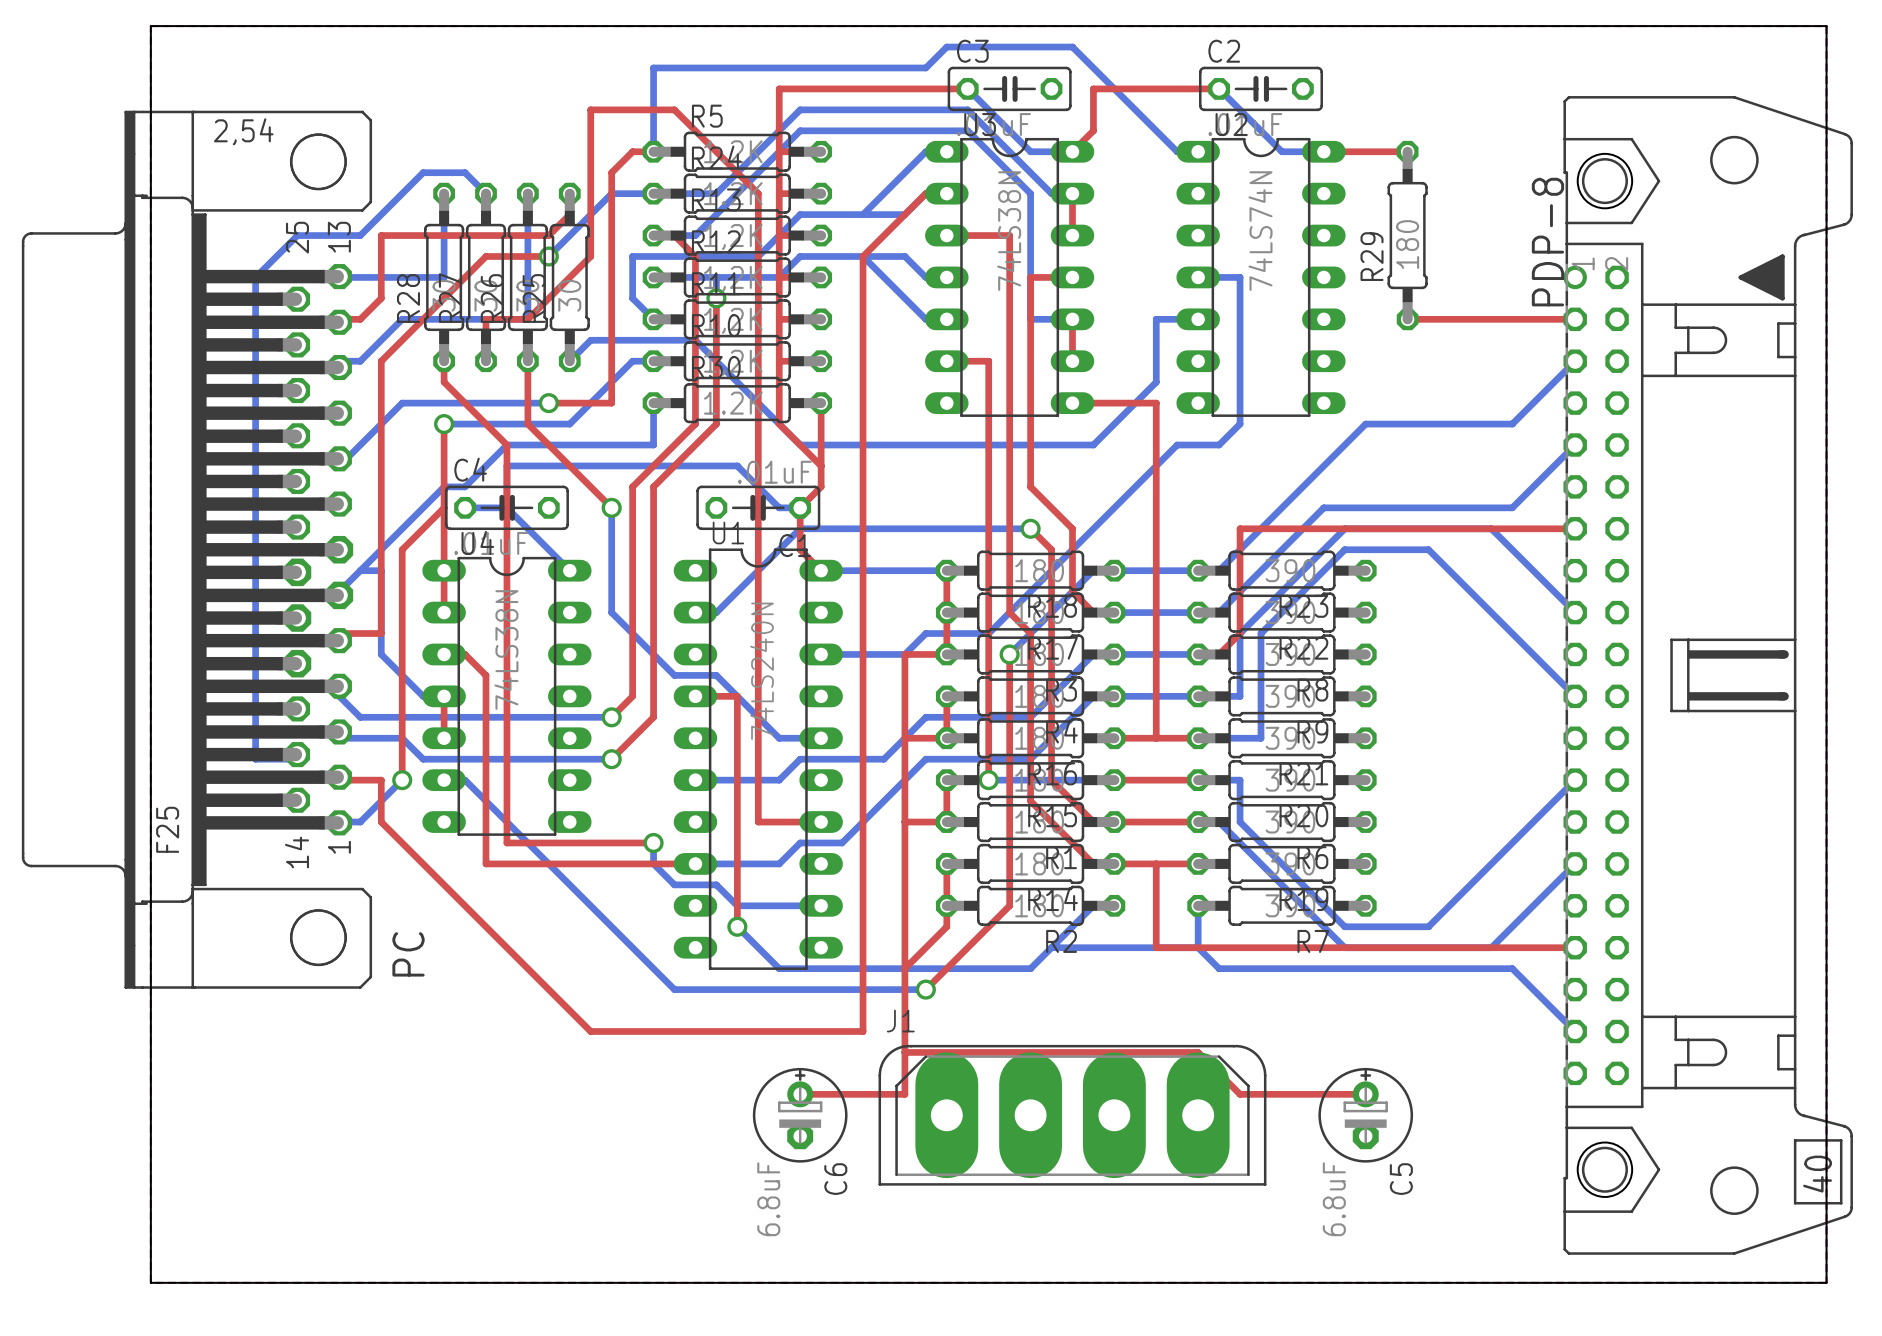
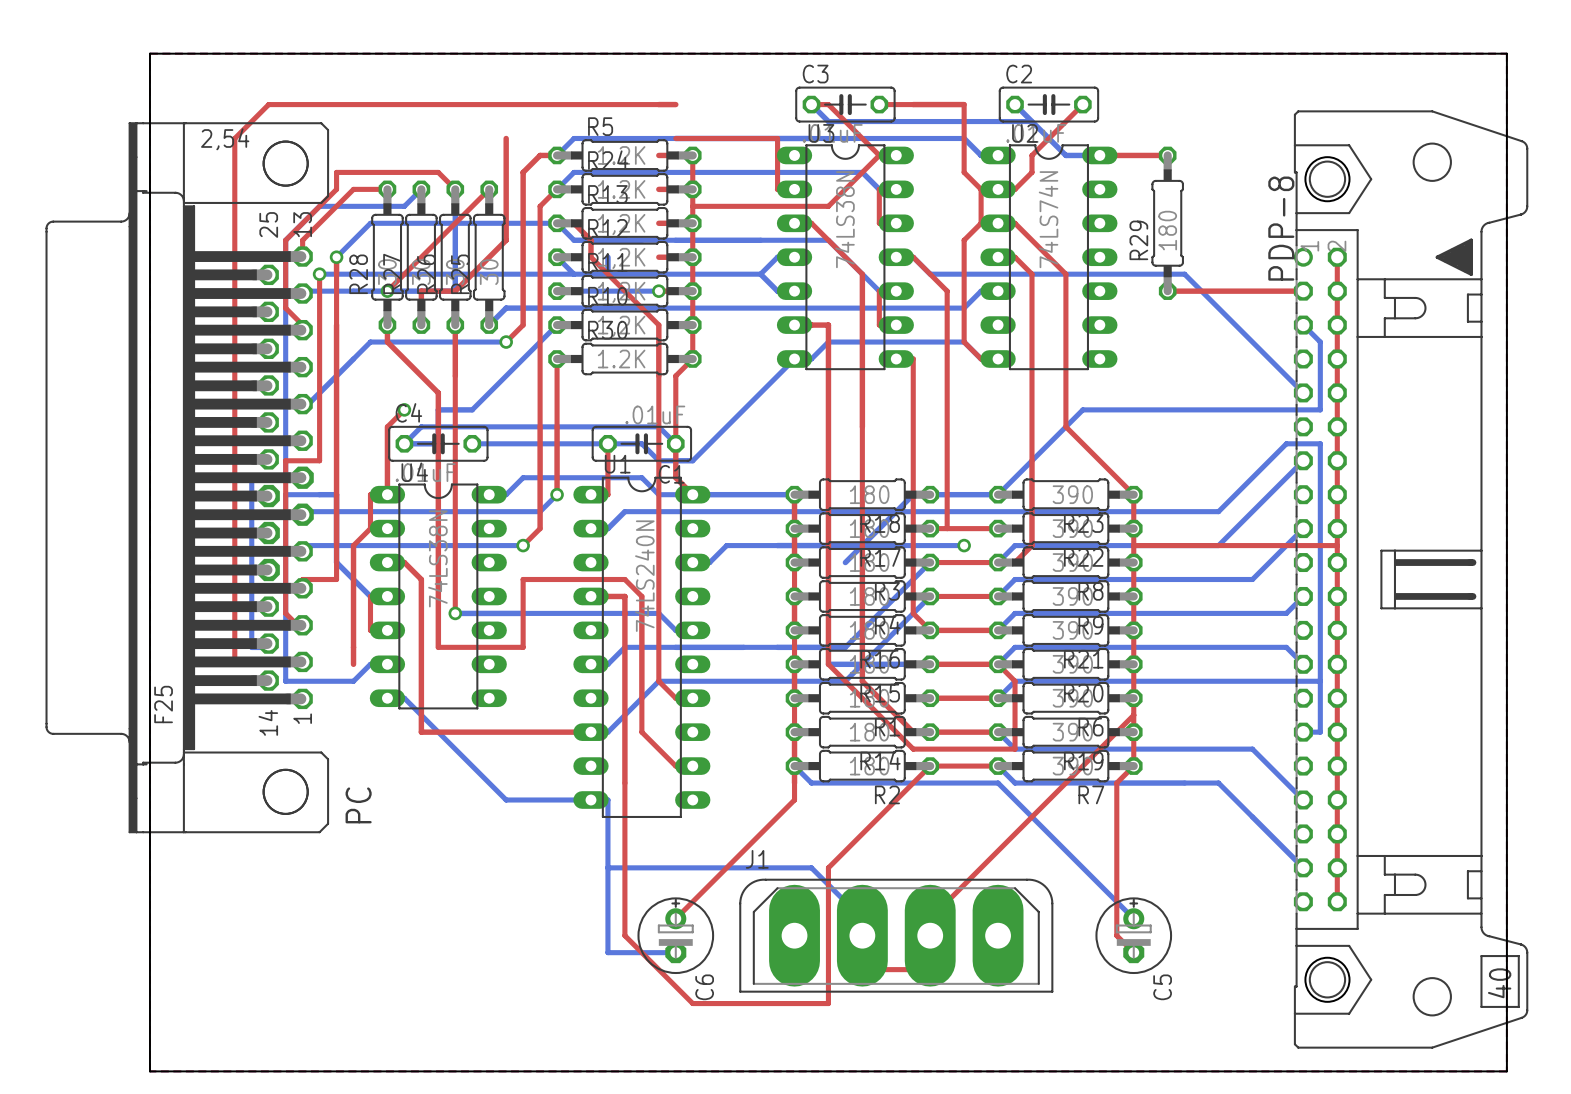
top track: (779, 88) (779, 361) (821, 361) -> none
top track: (800, 88) (967, 88) -> (879, 155) (828, 104) (811, 104)
top track: (1093, 88) (1093, 130) (1072, 151) -> (913, 104) (879, 104)
top track: (1156, 88) (1219, 88) -> (964, 104) (964, 172) (981, 189)
top track: none -> (1082, 104) (1031, 155) (1031, 172) (1015, 189) (981, 189)
bottom track: (988, 109) (1030, 151) (1072, 151) -> (828, 121) (1031, 121)
top track: (590, 130) (590, 109) (674, 109) (758, 193) (758, 696) -> none
top track: none -> (675, 138) (777, 138) (777, 189)
bottom track: (800, 130) (695, 235) (653, 235) -> (675, 138) (574, 138) (557, 155)
bottom track: (967, 130) (1030, 193) (1030, 319) (1051, 319) -> (811, 138) (964, 138)
bottom track: (1156, 130) (1072, 47) (946, 47) (925, 67) (653, 67) (653, 151) -> none
bottom track: (946, 151) (925, 151) (863, 214) -> none
top track: none -> (879, 155) (828, 206) (692, 206)
bottom track: (1030, 172) (967, 109) (800, 109) (716, 193) (611, 193) (548, 256) -> (862, 172) (574, 172) (557, 189)
top track: none -> (387, 189) (353, 189) (302, 240) (302, 257)
bottom track: (444, 193) (444, 277) (339, 276) -> none
bottom track: (486, 193) (465, 172) (423, 172) (360, 235) (297, 235) (255, 277) (255, 759) (276, 759) -> (421, 189) (404, 206) (319, 206) (285, 240) (285, 477) (251, 477) (251, 647)
top track: none -> (455, 189) (438, 172) (336, 172) (336, 189) (285, 240) (285, 308) (302, 325) (302, 330)
top track: (569, 193) (569, 214) (548, 235) (381, 235) (381, 277) -> (489, 189) (387, 291)
top track: (925, 193) (863, 256) (863, 1031) (590, 1031) (381, 822) (381, 780) (339, 780) -> (658, 104) (268, 104) (234, 138) (234, 664) (302, 664)
bottom track: (946, 193) (925, 193) (904, 214) (800, 214) (758, 256) -> none
top track: (1072, 193) (1072, 235) -> (896, 189) (879, 189) (879, 223) (896, 223)
top track: none -> (981, 189) (981, 223)
top track: (967, 235) (1009, 235) (1009, 612) (1030, 633) -> none
top track: none -> (981, 223) (964, 240) (964, 342) (981, 359) (998, 359)
top track: none -> (981, 223) (1015, 223) (1065, 274) (1065, 426) (1133, 494) (1133, 766) (1116, 783) (1116, 935) (1133, 952)
top track: (548, 256) (486, 256) (381, 361) -> none
via: (548, 256) -> none
bottom track: (674, 256) (632, 256) (632, 298) (653, 319) -> (658, 291) (557, 291)
bottom track: none -> (574, 240) (557, 223) (370, 223) (336, 257)
bottom track: (800, 256) (779, 277) (653, 277) -> (675, 240) (641, 240)
bottom track: (863, 256) (904, 298) -> none
bottom track: (904, 256) (925, 277) -> (760, 240) (828, 240) (879, 291)
via: none -> (336, 257)
bottom track: none -> (557, 257) (574, 274)
top track: (695, 277) (695, 424) (632, 486) -> (557, 189) (540, 206) (540, 426)
top track: none -> (590, 257) (658, 325)
bottom track: none -> (777, 257) (760, 274) (319, 274)
top track: (1072, 277) (1030, 277) (1030, 298) -> (811, 223) (862, 274)
top track: none -> (896, 257) (913, 257) (947, 291) (947, 528)
bottom track: (1198, 277) (1240, 277) (1240, 424) (1219, 445) (1177, 445) (988, 633) -> (964, 545) (828, 545)
top track: none -> (1337, 257) (1337, 901)
top track: none -> (319, 274) (319, 460) (285, 460) (285, 613) (302, 630) (302, 625)
via: none -> (319, 274)
top track: (381, 298) (360, 319) (339, 319) (339, 322) -> (336, 274) (336, 325)
top track: (716, 298) (716, 424) (653, 486) -> (557, 359) (557, 426)
via: (716, 298) -> none
bottom track: (402, 319) (360, 361) (339, 361) (339, 367) -> (353, 291) (302, 291) (302, 293)
via: none -> (387, 291)
via: none -> (658, 291)
top track: (1072, 319) (1072, 361) -> (896, 291) (879, 291) (879, 325) (896, 325)
bottom track: (1177, 319) (1156, 319) (1156, 382) (1093, 445) (800, 445) (695, 340) -> (981, 291) (964, 308) (590, 308)
top track: (611, 361) (611, 403) (548, 403) -> (523, 325) (506, 342)
bottom track: (653, 361) (632, 361) (569, 424) (444, 424) -> (557, 325) (472, 409)
bottom track: (1575, 361) (1512, 424) (1365, 424) (1219, 570) (1198, 570) -> (1303, 325) (1320, 342) (1320, 409) (1082, 409) (998, 494)
via: none -> (506, 342)
bottom track: (402, 403) (548, 403) -> (353, 359) (370, 342) (506, 342)
via: (548, 403) -> none
bottom track: (653, 403) (653, 445) (506, 445) (465, 486) (444, 486) (339, 591) -> (557, 494) (540, 511) (302, 511)
top track: (821, 403) (821, 486) (800, 507) -> (692, 155) (692, 359) (675, 375) (675, 443)
top track: (1093, 403) (1156, 403) (1156, 738) -> (913, 359) (913, 613) (930, 630)
top track: (444, 424) (444, 486) -> (404, 409) (387, 426)
via: (444, 424) -> none
top track: (527, 424) (611, 507) -> (455, 375) (455, 613)
top track: (779, 424) (821, 465) -> (658, 375) (658, 681) (675, 698)
bottom track: (1575, 445) (1512, 507) (1323, 507) (1219, 612) (1114, 612) -> (1303, 392) (1184, 274) (930, 274) (913, 257) (896, 257)
via: none -> (404, 409)
bottom track: (548, 465) (737, 465) (779, 507) (800, 507) -> (404, 443) (421, 426) (658, 426) (675, 443)
top track: (1030, 486) (1072, 528) (1072, 591) (1093, 612) (1114, 612) -> (862, 426) (862, 545)
top track: (444, 507) (402, 549) (402, 633) -> (370, 528) (353, 545)
bottom track: (506, 507) (569, 570) -> (692, 494) (658, 494) (641, 477) (523, 477) (506, 494) (489, 494)
bottom track: (611, 507) (611, 612) (674, 675) (716, 675) (779, 738) (800, 738) -> (523, 613) (658, 613) (675, 630)
via: (611, 507) -> none
top track: none -> (607, 443) (607, 494) (590, 494)
bottom track: (800, 528) (737, 591) -> (675, 460) (658, 460) (641, 443) (472, 443)
bottom track: (821, 528) (1030, 528) -> (692, 460) (794, 359) (811, 359) (828, 342) (964, 342) (981, 359) (998, 359)
top track: (1030, 528) (1051, 549) (1051, 780) (1093, 822) (1114, 822) -> none
via: (1030, 528) -> none
top track: (1240, 528) (1575, 528) -> (1031, 460) (1031, 274) (1015, 257) (998, 257)
top track: (444, 570) (444, 612) -> (387, 494) (370, 494) (370, 528)
top track: (653, 570) (653, 717) (611, 759) -> none
via: none -> (557, 494)
bottom track: none -> (624, 511) (1218, 511) (1286, 443) (1320, 443) (1320, 732) (1303, 732)
top track: (632, 612) (632, 696) (611, 717) -> (540, 528) (523, 545)
top track: none -> (930, 528) (998, 528)
bottom track: (1575, 612) (1491, 528) (1344, 528) (1240, 633) (1240, 696) (1093, 696) (1030, 759) (1009, 759) -> (1303, 528) (1252, 579) (1015, 579) (998, 596)
top track: (381, 633) (339, 633) (339, 640) -> (336, 545) (336, 579) (302, 579) (302, 588)
bottom track: none -> (523, 545) (302, 545) (302, 551)
via: none -> (523, 545)
bottom track: (925, 633) (904, 654) (842, 654) -> (777, 545) (726, 545) (709, 562)
via: none -> (964, 545)
top track: none -> (1133, 545) (1337, 545)
top track: (946, 654) (904, 654) (904, 1094) (800, 1094) -> (794, 562) (794, 596)
top track: (1009, 654) (1009, 905) (925, 989) -> none
via: (1009, 654) -> none
top track: none -> (930, 562) (998, 562)
bottom track: none -> (930, 562) (845, 647)
bottom track: (1198, 654) (1093, 654) (1030, 717) (925, 717) (883, 759) -> (998, 562) (1015, 545) (1218, 545) (1303, 460)
bottom track: (339, 686) (339, 696) (360, 717) (527, 717) -> none
top track: (444, 696) (444, 738) -> (387, 596) (370, 596) (370, 630) (387, 630)
top track: none -> (930, 596) (998, 596)
bottom track: none -> (930, 596) (845, 681) (658, 681) (607, 732)
bottom track: (1575, 696) (1428, 549) (1344, 549) (1261, 633) (1261, 738) (1198, 738) -> (1303, 596) (1286, 613) (1015, 613) (998, 630)
via: none -> (455, 613)
via: (611, 717) -> none
bottom track: (339, 731) (339, 738) (402, 738) (423, 759) (611, 759) -> none
top track: (904, 738) (946, 738) -> (794, 664) (794, 630)
top track: (506, 759) (506, 842) (653, 842) -> (438, 647) (523, 647) (523, 579) (624, 579) (641, 596)
via: (611, 759) -> none
bottom track: (800, 759) (779, 780) (716, 780) -> (675, 647) (624, 647) (607, 664)
bottom track: (925, 759) (842, 842) (800, 842) (779, 863) (716, 863) -> (777, 647) (743, 647)
bottom track: (402, 780) (360, 822) (339, 822) -> none
via: (402, 780) -> none
bottom track: (444, 780) (465, 780) (674, 989) (925, 989) -> (387, 664) (370, 664) (353, 681) (285, 681) (285, 494) (319, 494)
top track: none -> (828, 664) (913, 749) (1015, 749) (1015, 681) (998, 664)
via: (988, 780) -> none
bottom track: (1198, 780) (1240, 780) (1240, 822) (1344, 926) -> (998, 766) (1015, 783) (1116, 783)
bottom track: none -> (998, 664) (1015, 647) (1286, 647) (1303, 664)
bottom track: (1575, 780) (1428, 926) -> (1252, 816) (1218, 783) (1184, 783)
bottom track: none -> (387, 698) (404, 698) (506, 800) (607, 800) (607, 952) (675, 952)
top track: (758, 822) (800, 822) -> (641, 698) (641, 732) (675, 766) (692, 766)
top track: (904, 822) (946, 822) -> (794, 732) (794, 698)
bottom track: (1198, 822) (1219, 822) (1344, 947) (1491, 947) (1575, 863) -> (998, 698) (1015, 681) (1320, 681)
bottom track: (653, 842) (653, 863) (674, 884) (716, 884) (737, 905) (821, 905) -> none
via: (653, 842) -> none
top track: none -> (1133, 715) (947, 901) (913, 969) (879, 969) (862, 935)
top track: (1156, 863) (1156, 947) (1575, 947) -> none
bottom track: none -> (998, 732) (1015, 749) (1252, 749) (1303, 800)
bottom track: none -> (794, 766) (811, 783) (998, 783) (1133, 918)
bottom track: (1114, 905) (1093, 905) (1030, 968) (779, 968) (737, 926) -> none
top track: none -> (998, 766) (930, 766) (828, 867) (828, 1003) (692, 1003) (624, 935) (624, 783)
bottom track: (1198, 905) (1198, 947) -> none
via: (737, 926) -> none
top track: (946, 926) (904, 968) -> (794, 783) (794, 800) (675, 918)
bottom track: (1051, 947) (1198, 947) -> none
bottom track: (1198, 947) (1219, 968) (1512, 968) -> none
via: (925, 989) -> none
bottom track: none -> (607, 867) (811, 867) (845, 901) (862, 935)
top track: (904, 1052) (1198, 1052) (1240, 1094) (1365, 1094) -> none
C6 value: 6.8uF (768, 1199) -> none
C5 value: 6.8uF (1334, 1199) -> none

